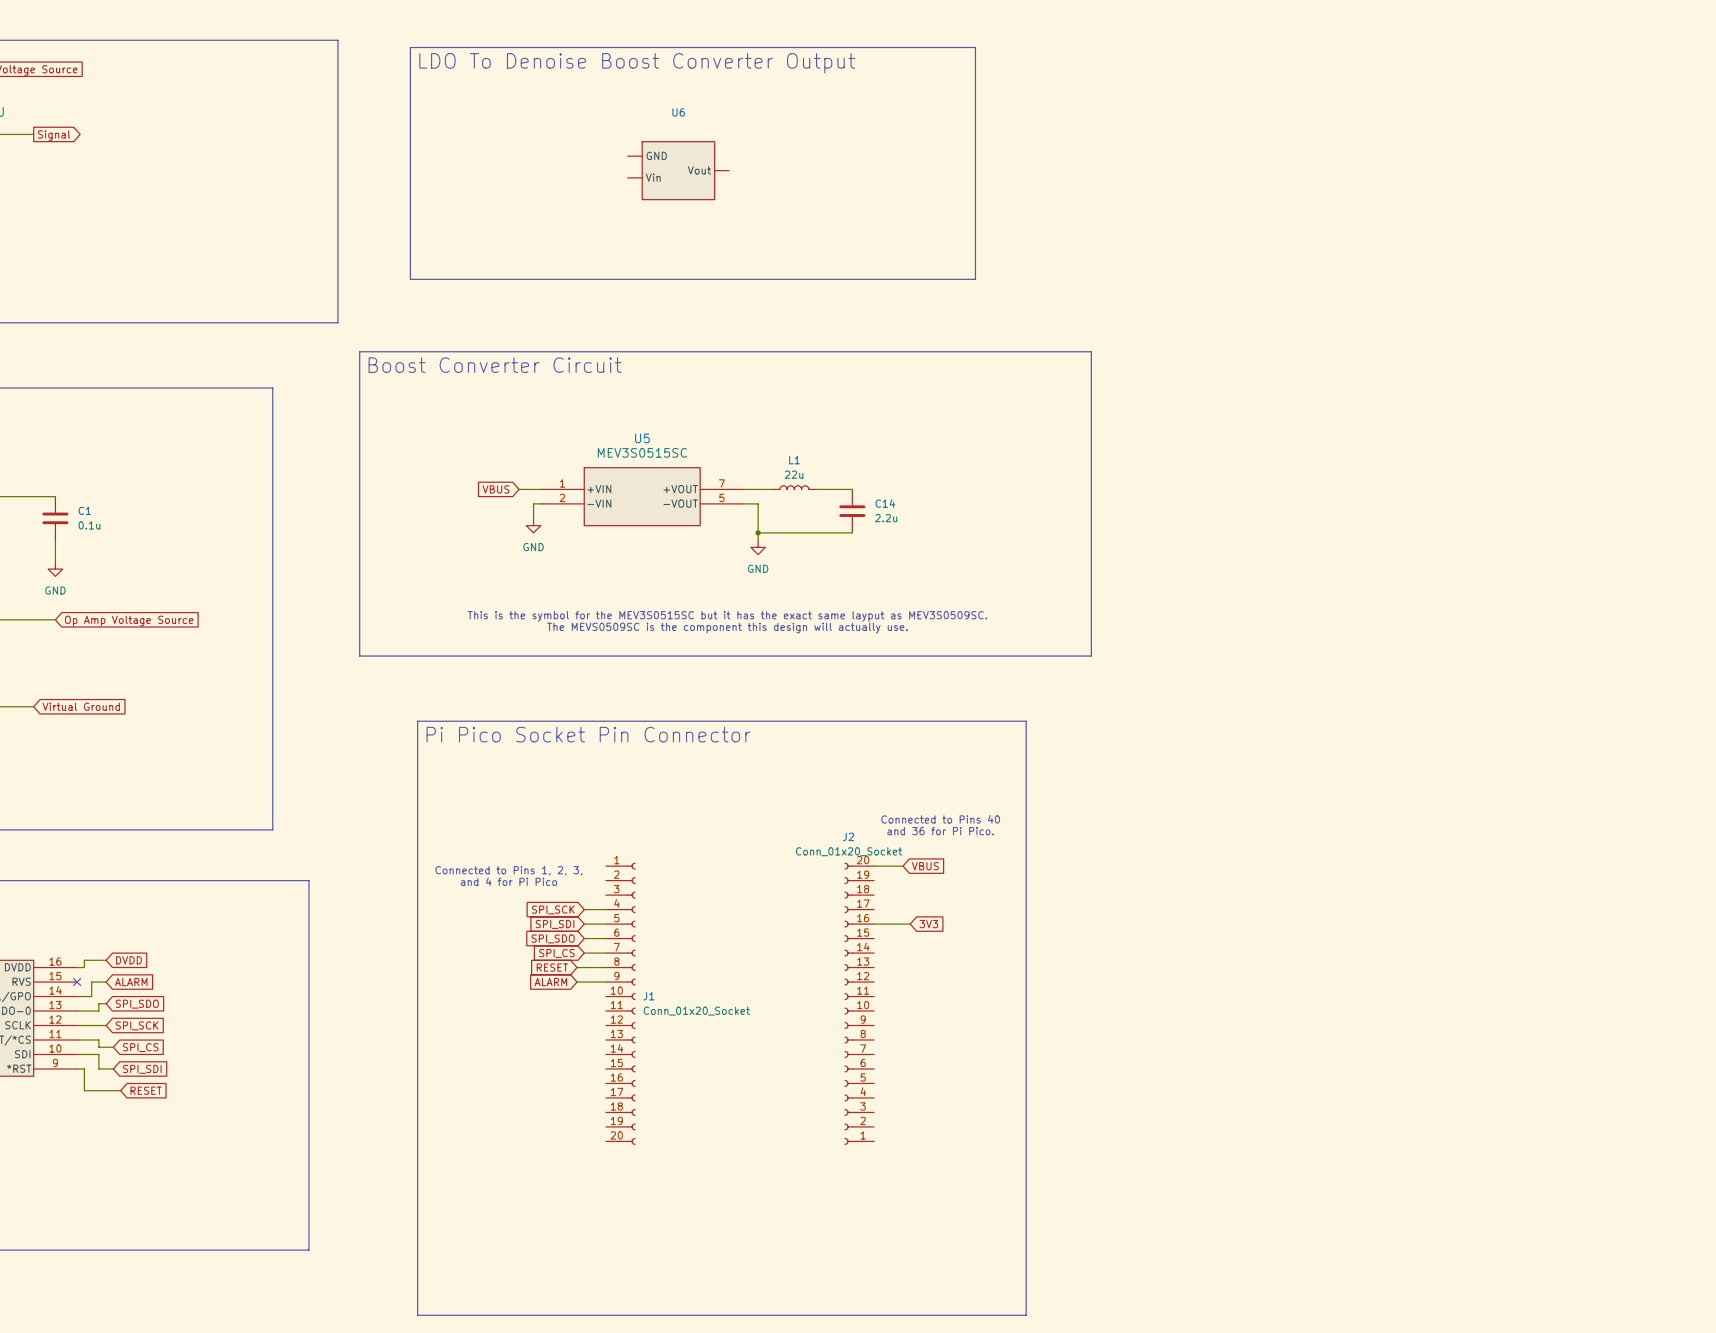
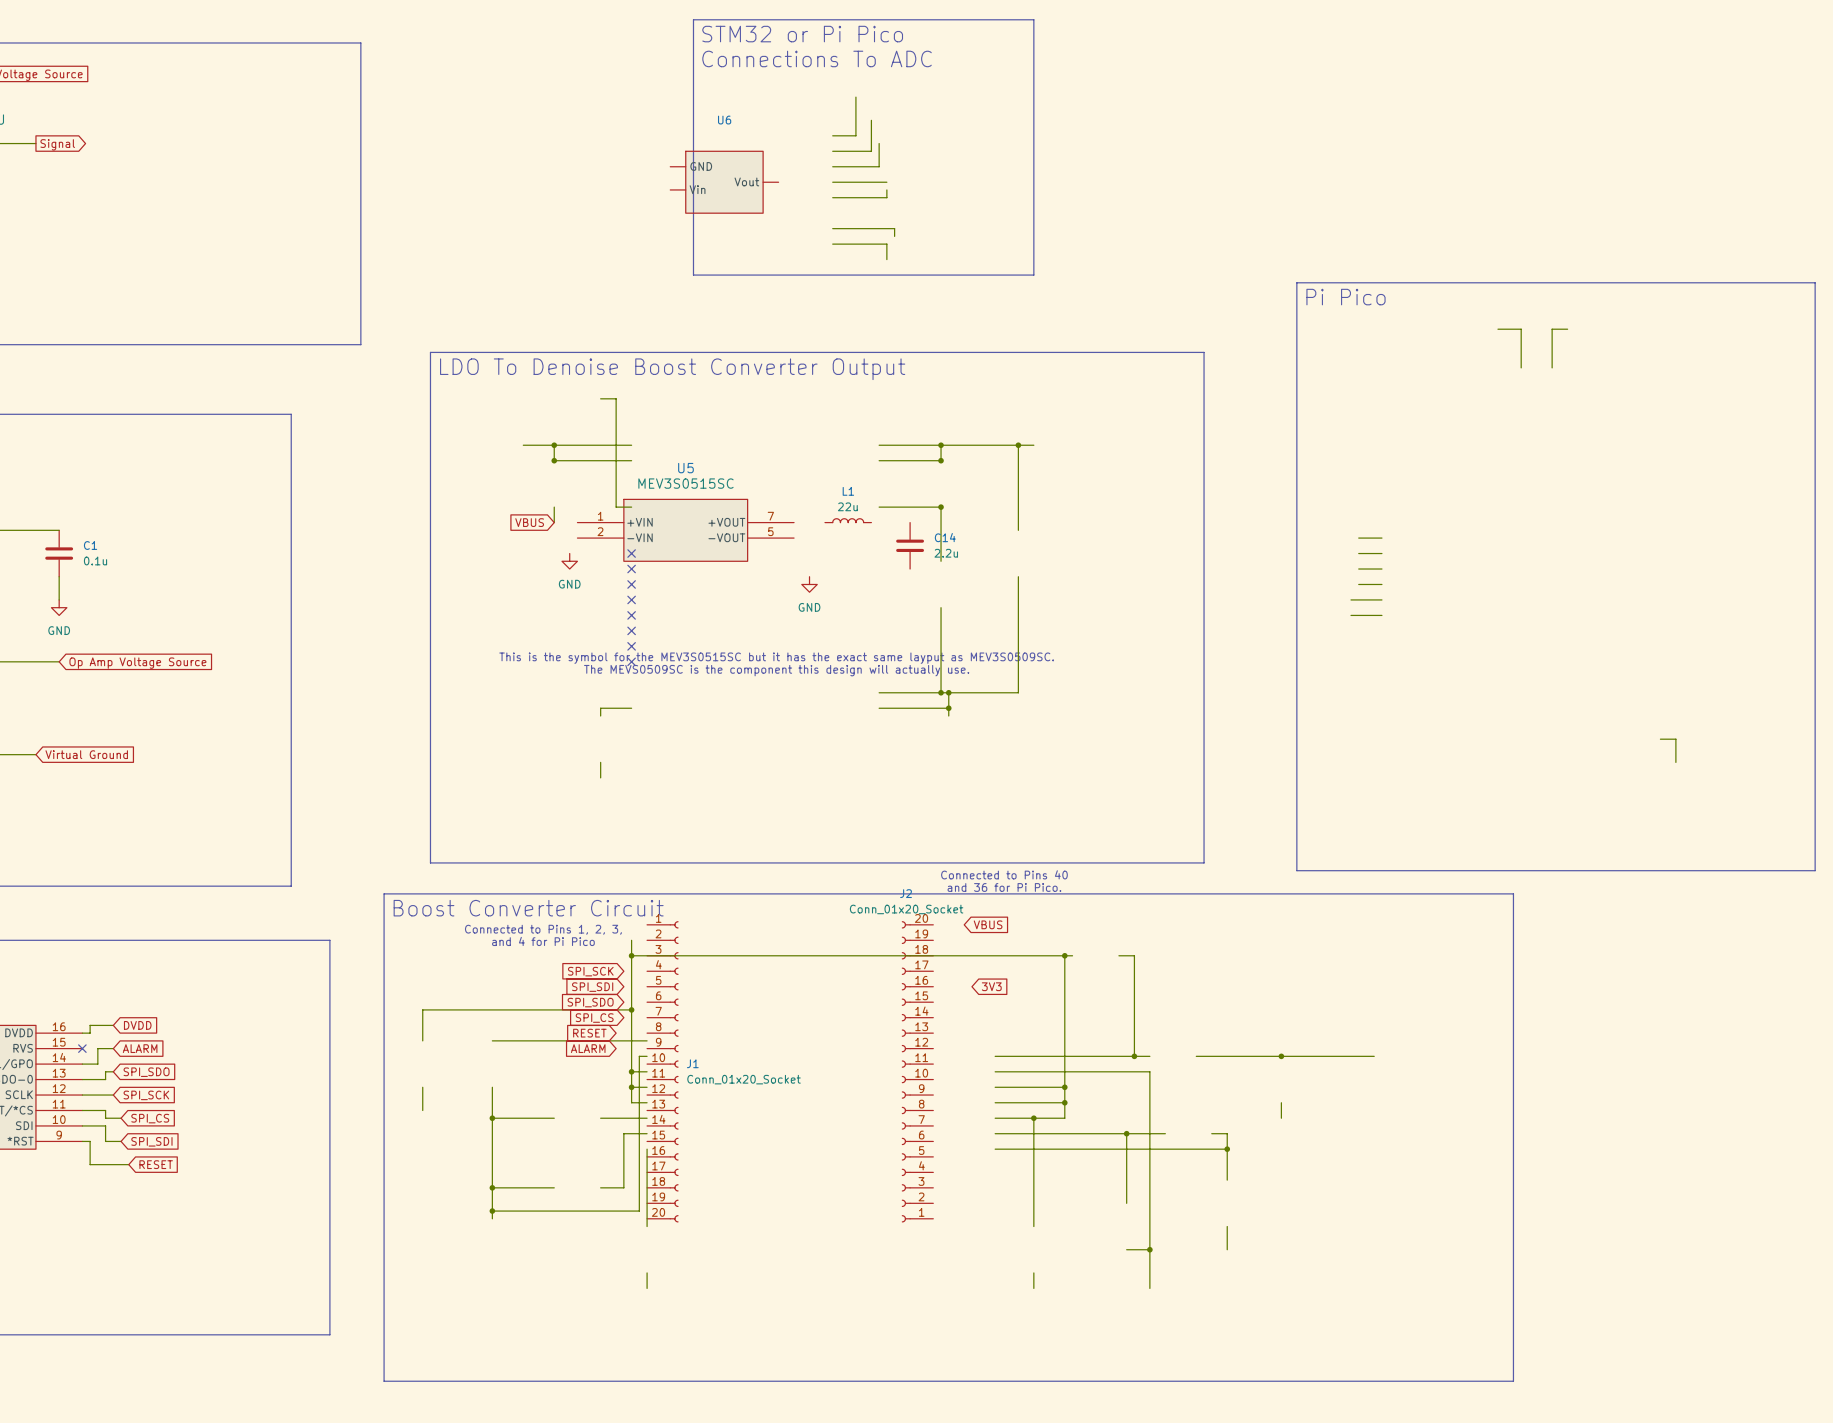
line: none -> (693, 19) (1033, 19) (1033, 275) (693, 275) (693, 19)
text: none -> STM32 or Pi Pico (802, 34)
line: (410, 47) (975, 47) (975, 279) (410, 279) (410, 47) -> none
text: none -> Connections To ADC (817, 58)
text: LDO To Denoise Boost Converter Output (637, 63) -> none
wire: none -> (855, 97) (855, 135) (832, 135)
wire: none -> (871, 120) (871, 151) (832, 151)
wire: none -> (879, 143) (879, 166) (832, 166)
wire: none -> (832, 182) (886, 182)
wire: none -> (886, 189) (886, 197) (832, 197)
wire: none -> (832, 228) (894, 228) (894, 236)
wire: none -> (832, 244) (886, 244) (886, 259)
line: none -> (1296, 282) (1815, 282) (1815, 870) (1296, 870) (1296, 282)
text: none -> Pi Pico (1346, 297)
wire: none -> (1497, 329) (1521, 329) (1521, 367)
wire: none -> (1567, 329) (1552, 329) (1552, 367)
text: none -> LDO To Denoise Boost Converter Output (672, 369)
line: (359, 351) (1091, 351) (1091, 656) (359, 656) (359, 351) -> (430, 352) (430, 862) (1204, 862) (1204, 352) (430, 352)
text: Boost Converter Circuit (495, 365) -> none
wire: none -> (600, 398) (616, 398) (616, 507) (631, 507)
wire: none -> (523, 445) (631, 445)
wire: none -> (554, 445) (554, 460) (631, 460)
junction: none -> (554, 445)
wire: none -> (879, 445) (1033, 445)
wire: none -> (941, 445) (941, 460) (879, 460)
junction: none -> (941, 445)
wire: none -> (1018, 445) (1018, 530)
junction: none -> (1018, 445)
junction: none -> (554, 460)
junction: none -> (941, 460)
wire: none -> (879, 507) (941, 507) (941, 561)
junction: none -> (941, 507)
wire: (519, 489) (540, 489) -> (554, 522) (554, 507)
wire: (743, 489) (772, 489) -> none
wire: (816, 489) (852, 489) -> none
wire: (540, 503) (533, 503) (533, 518) -> none
wire: (743, 503) (758, 503) (758, 540) -> none
wire: none -> (1358, 538) (1381, 538)
no-connect mark: none -> (631, 553)
wire: none -> (1358, 553) (1381, 553)
no-connect mark: none -> (631, 569)
wire: (758, 532) (852, 532) -> none
junction: (758, 532) -> none
wire: none -> (1358, 569) (1381, 569)
wire: none -> (1018, 576) (1018, 692) (879, 692)
no-connect mark: none -> (631, 584)
wire: none -> (1358, 584) (1381, 584)
no-connect mark: none -> (631, 599)
wire: none -> (1351, 599) (1381, 599)
wire: none -> (941, 607) (941, 692)
no-connect mark: none -> (631, 615)
wire: none -> (1351, 615) (1381, 615)
no-connect mark: none -> (631, 630)
no-connect mark: none -> (631, 646)
no-connect mark: none -> (631, 661)
junction: none -> (941, 692)
wire: none -> (948, 692) (948, 715)
junction: none -> (948, 692)
wire: none -> (631, 708) (600, 708) (600, 715)
wire: none -> (879, 708) (948, 708)
junction: none -> (948, 708)
wire: none -> (1660, 739) (1675, 739) (1675, 762)
wire: none -> (600, 762) (600, 777)
line: (417, 721) (1026, 721) (1026, 1315) (417, 1315) (417, 721) -> none
text: Pi Pico Socket Pin Connector (588, 734) -> none
line: none -> (384, 893) (1513, 893) (1513, 1381) (384, 1381) (384, 893)
text: none -> Boost Converter Circuit (528, 908)
wire: (874, 866) (903, 866) -> none
wire: none -> (631, 940) (631, 1102) (647, 1102)
wire: none -> (631, 955) (1072, 955)
junction: none -> (631, 955)
wire: none -> (1064, 955) (1064, 1118) (995, 1118)
junction: none -> (1064, 955)
wire: none -> (1118, 955) (1134, 955) (1134, 1056)
wire: (584, 909) (605, 909) -> none
wire: (584, 924) (605, 924) -> none
wire: (874, 924) (910, 924) -> none
wire: (584, 938) (605, 938) -> none
wire: none -> (631, 1009) (422, 1009) (422, 1040)
junction: none -> (631, 1009)
wire: (584, 953) (605, 953) -> none
wire: (577, 967) (605, 967) -> none
wire: none -> (492, 1040) (647, 1040)
wire: (577, 982) (605, 982) -> none
wire: none -> (647, 1056) (639, 1056) (639, 1211) (492, 1211)
wire: none -> (995, 1056) (1149, 1056)
junction: none -> (1134, 1056)
wire: none -> (1196, 1056) (1374, 1056)
junction: none -> (1281, 1056)
wire: none -> (631, 1071) (647, 1071)
junction: none -> (631, 1071)
wire: none -> (995, 1071) (1149, 1071) (1149, 1288)
wire: none -> (422, 1087) (422, 1110)
wire: none -> (492, 1087) (492, 1218)
wire: none -> (631, 1087) (647, 1087)
junction: none -> (631, 1087)
wire: none -> (995, 1087) (1064, 1087)
junction: none -> (1064, 1087)
wire: none -> (995, 1102) (1064, 1102)
junction: none -> (1064, 1102)
wire: none -> (1281, 1102) (1281, 1118)
wire: none -> (492, 1118) (554, 1118)
junction: none -> (492, 1118)
wire: none -> (600, 1118) (647, 1118)
wire: none -> (1033, 1118) (1033, 1226)
junction: none -> (1033, 1118)
wire: none -> (647, 1133) (623, 1133) (623, 1187) (600, 1187)
wire: none -> (995, 1133) (1165, 1133)
wire: none -> (1126, 1133) (1126, 1203)
junction: none -> (1126, 1133)
wire: none -> (1211, 1133) (1227, 1133) (1227, 1180)
wire: none -> (647, 1149) (647, 1226)
wire: none -> (995, 1149) (1227, 1149)
junction: none -> (1227, 1149)
wire: none -> (492, 1187) (554, 1187)
junction: none -> (492, 1187)
junction: none -> (492, 1211)
wire: none -> (1227, 1226) (1227, 1249)
wire: none -> (1126, 1249) (1149, 1249)
junction: none -> (1149, 1249)
wire: none -> (647, 1272) (647, 1288)
wire: none -> (1033, 1272) (1033, 1288)

